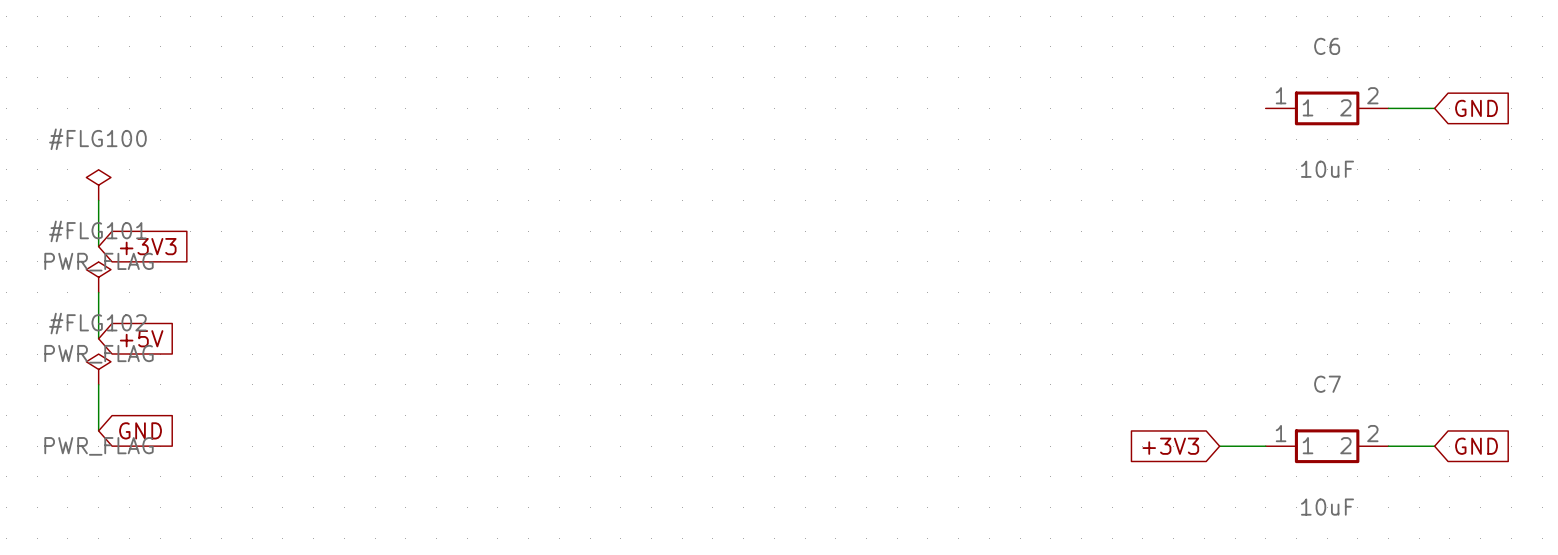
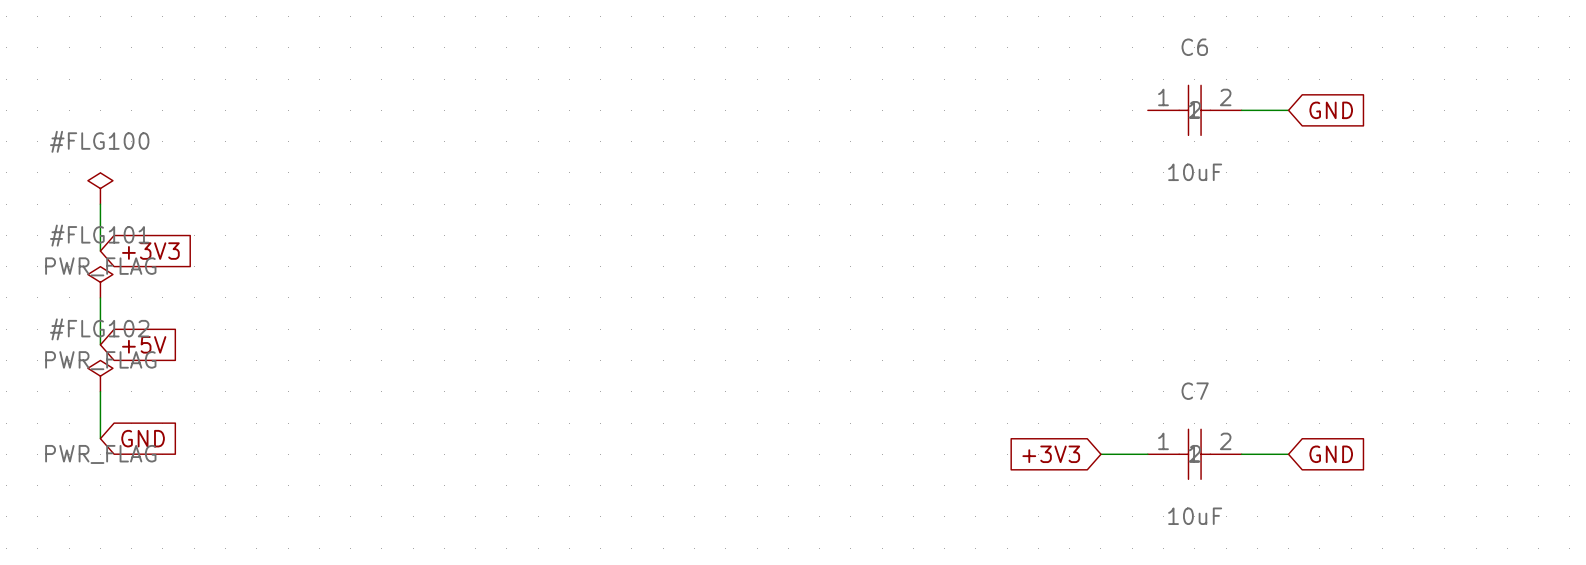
C6 symbol: [1265, 91, 1389, 126] -> [1147, 85, 1242, 136]
wire: (1388, 108) (1434, 108) -> (1241, 110) (1288, 110)
global label position: GND (1476, 108) -> GND (1331, 110)
C7 symbol: [1265, 429, 1389, 464] -> [1147, 429, 1242, 480]
wire: none -> (1100, 454) (1147, 454)
global label position: +3V3 (1170, 446) -> +3V3 (1051, 454)
wire: (1388, 446) (1434, 446) -> none
global label position: GND (1476, 446) -> GND (1331, 454)

